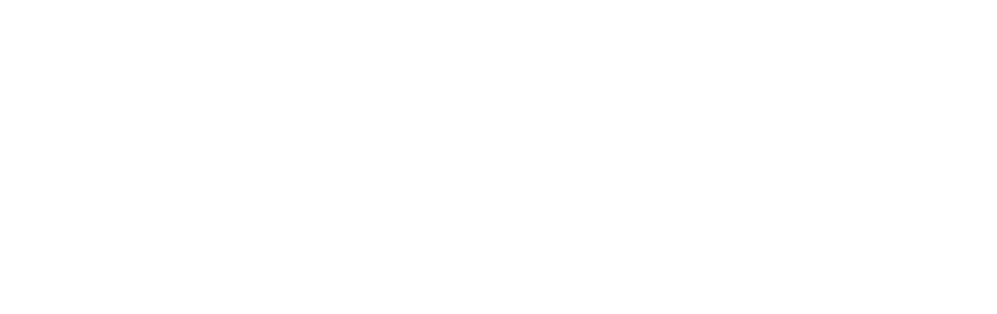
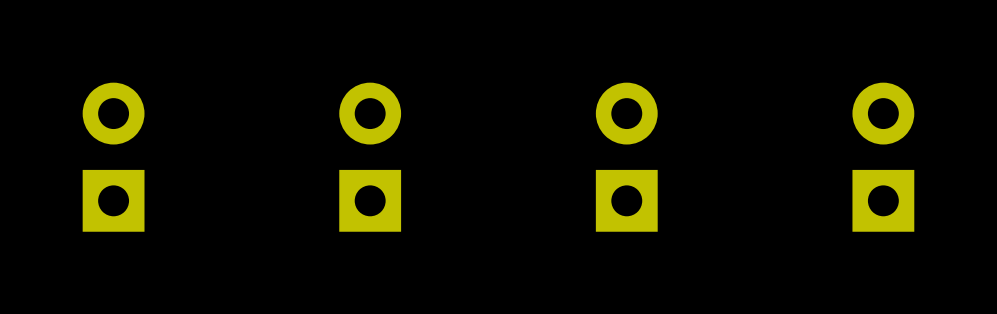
part: none -> (113, 157)
part: none -> (370, 157)
part: none -> (626, 157)
part: none -> (883, 157)

